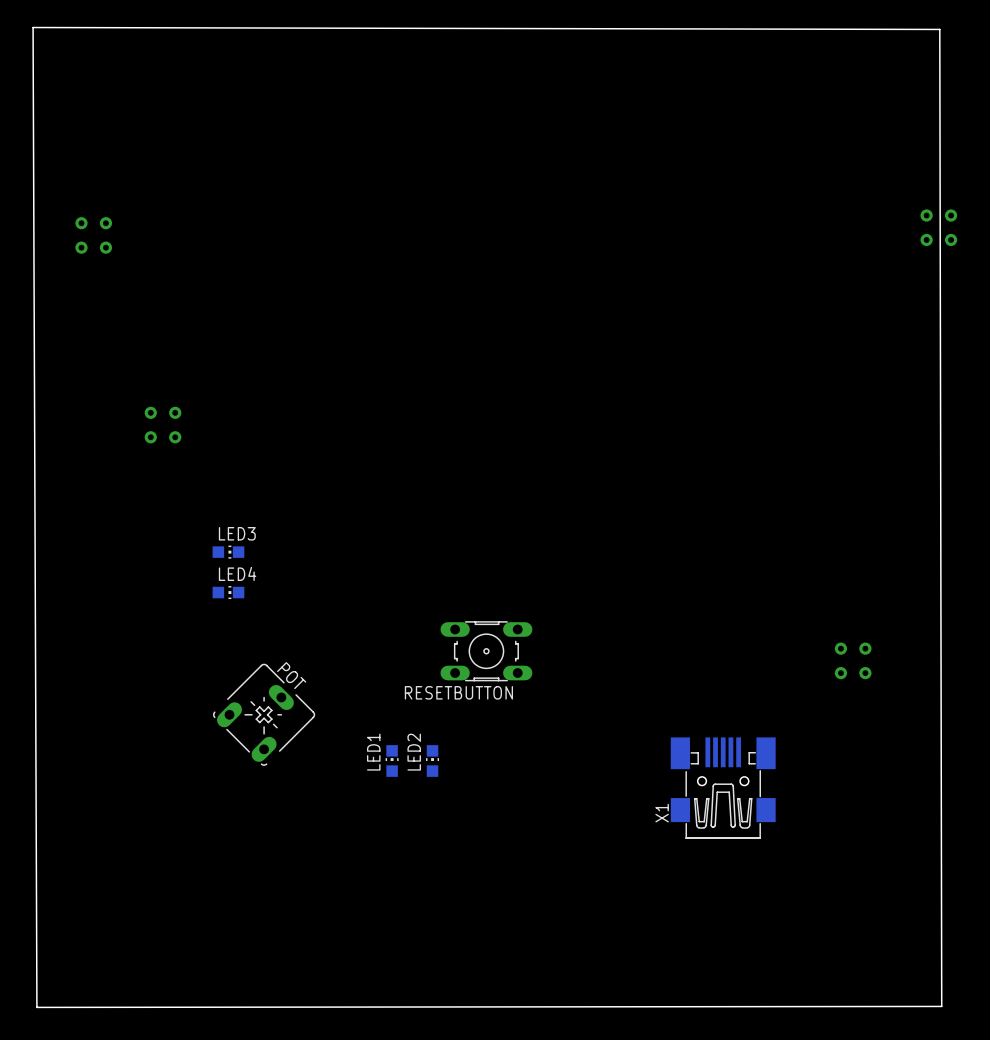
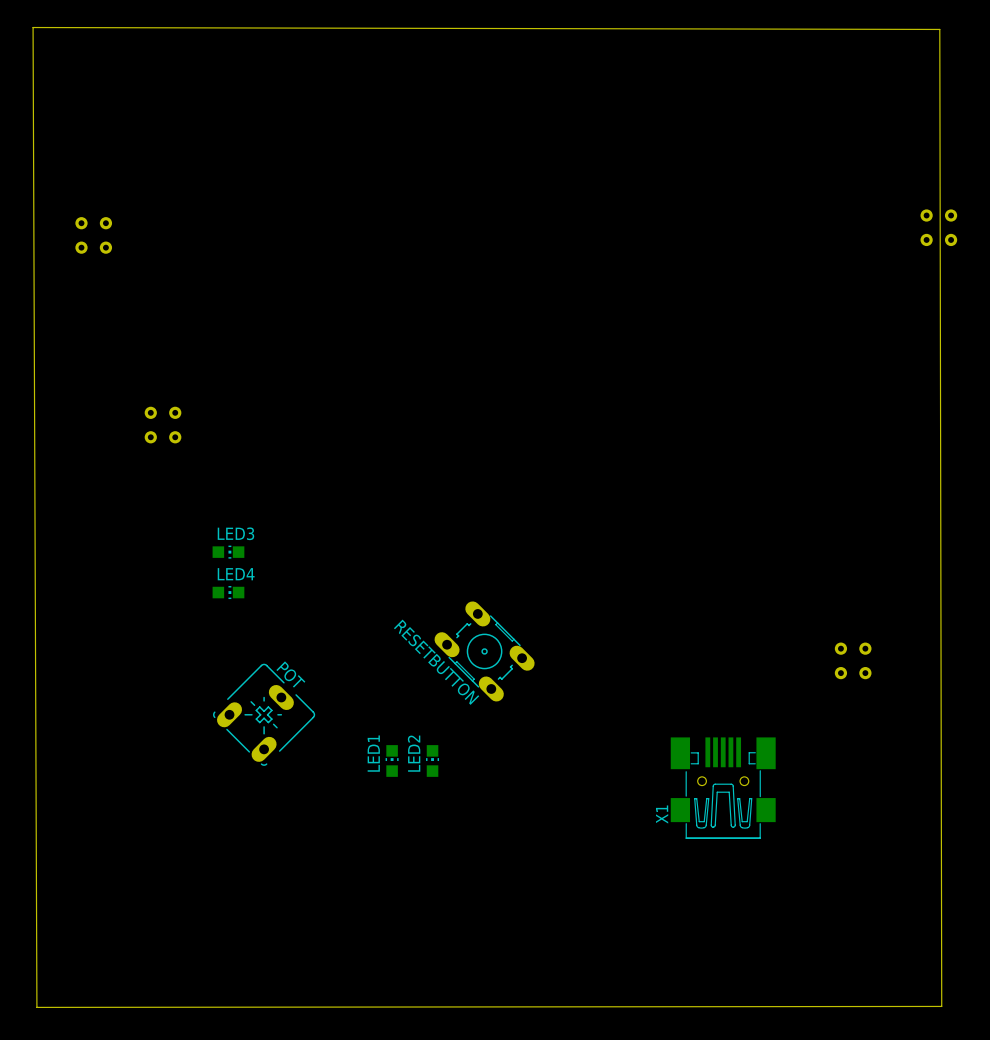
RESETBUTTON footprint: [440, 621, 533, 682] -> [434, 601, 535, 702]
RESETBUTTON name position: RESETBUTTON (458, 692) -> RESETBUTTON (436, 662)

